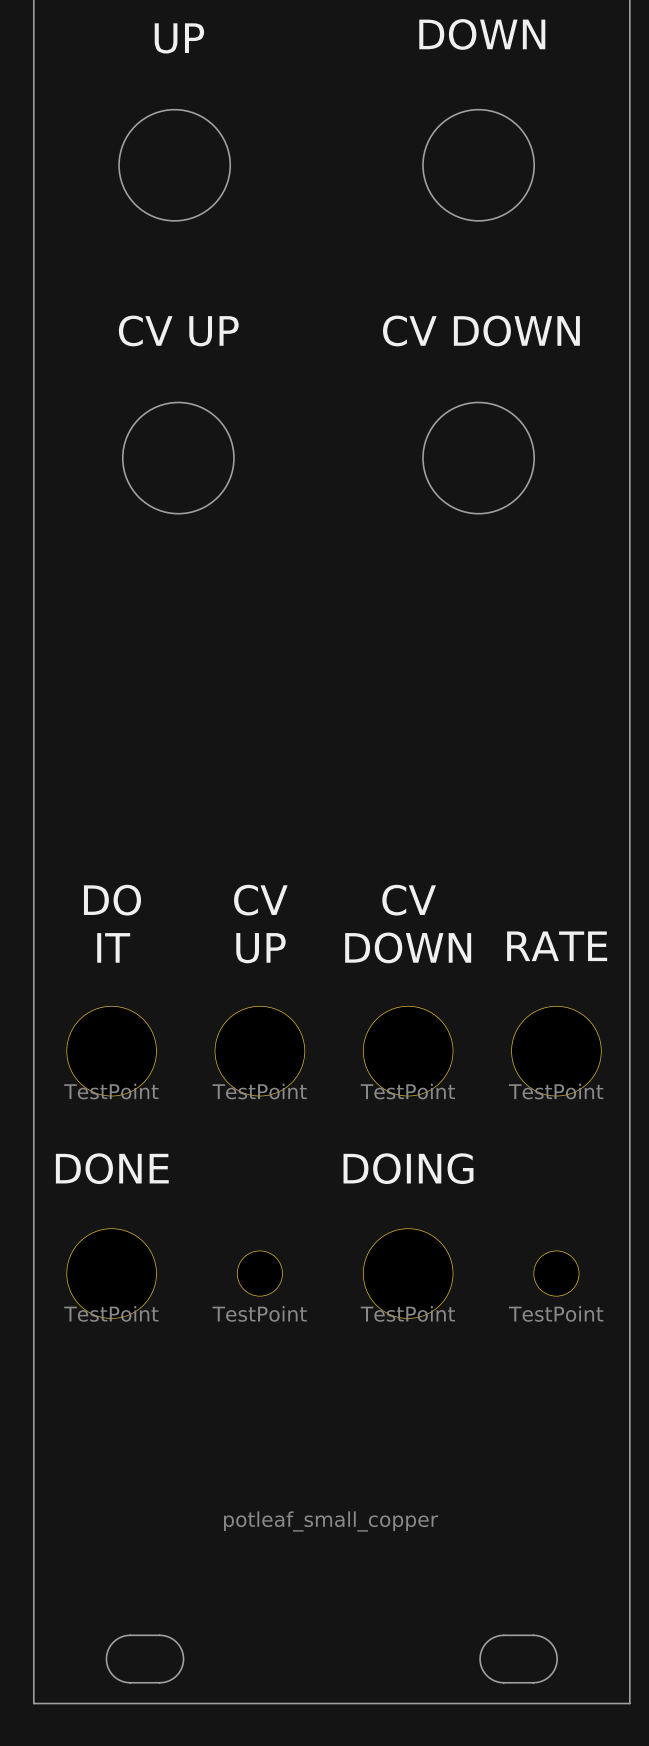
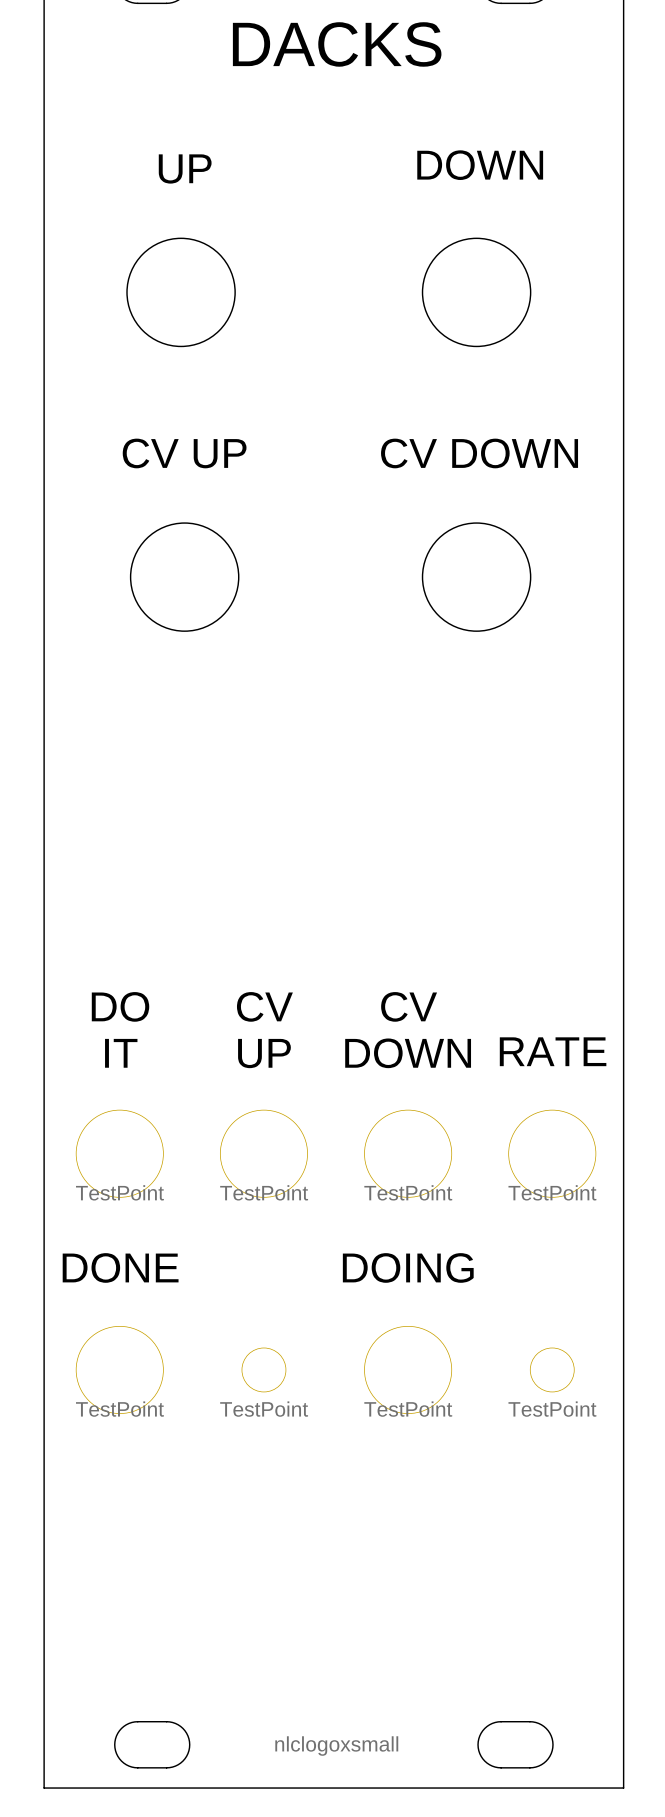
drawing: [224, 1511, 439, 1532] -> none
drawing: none -> [275, 1736, 399, 1756]

